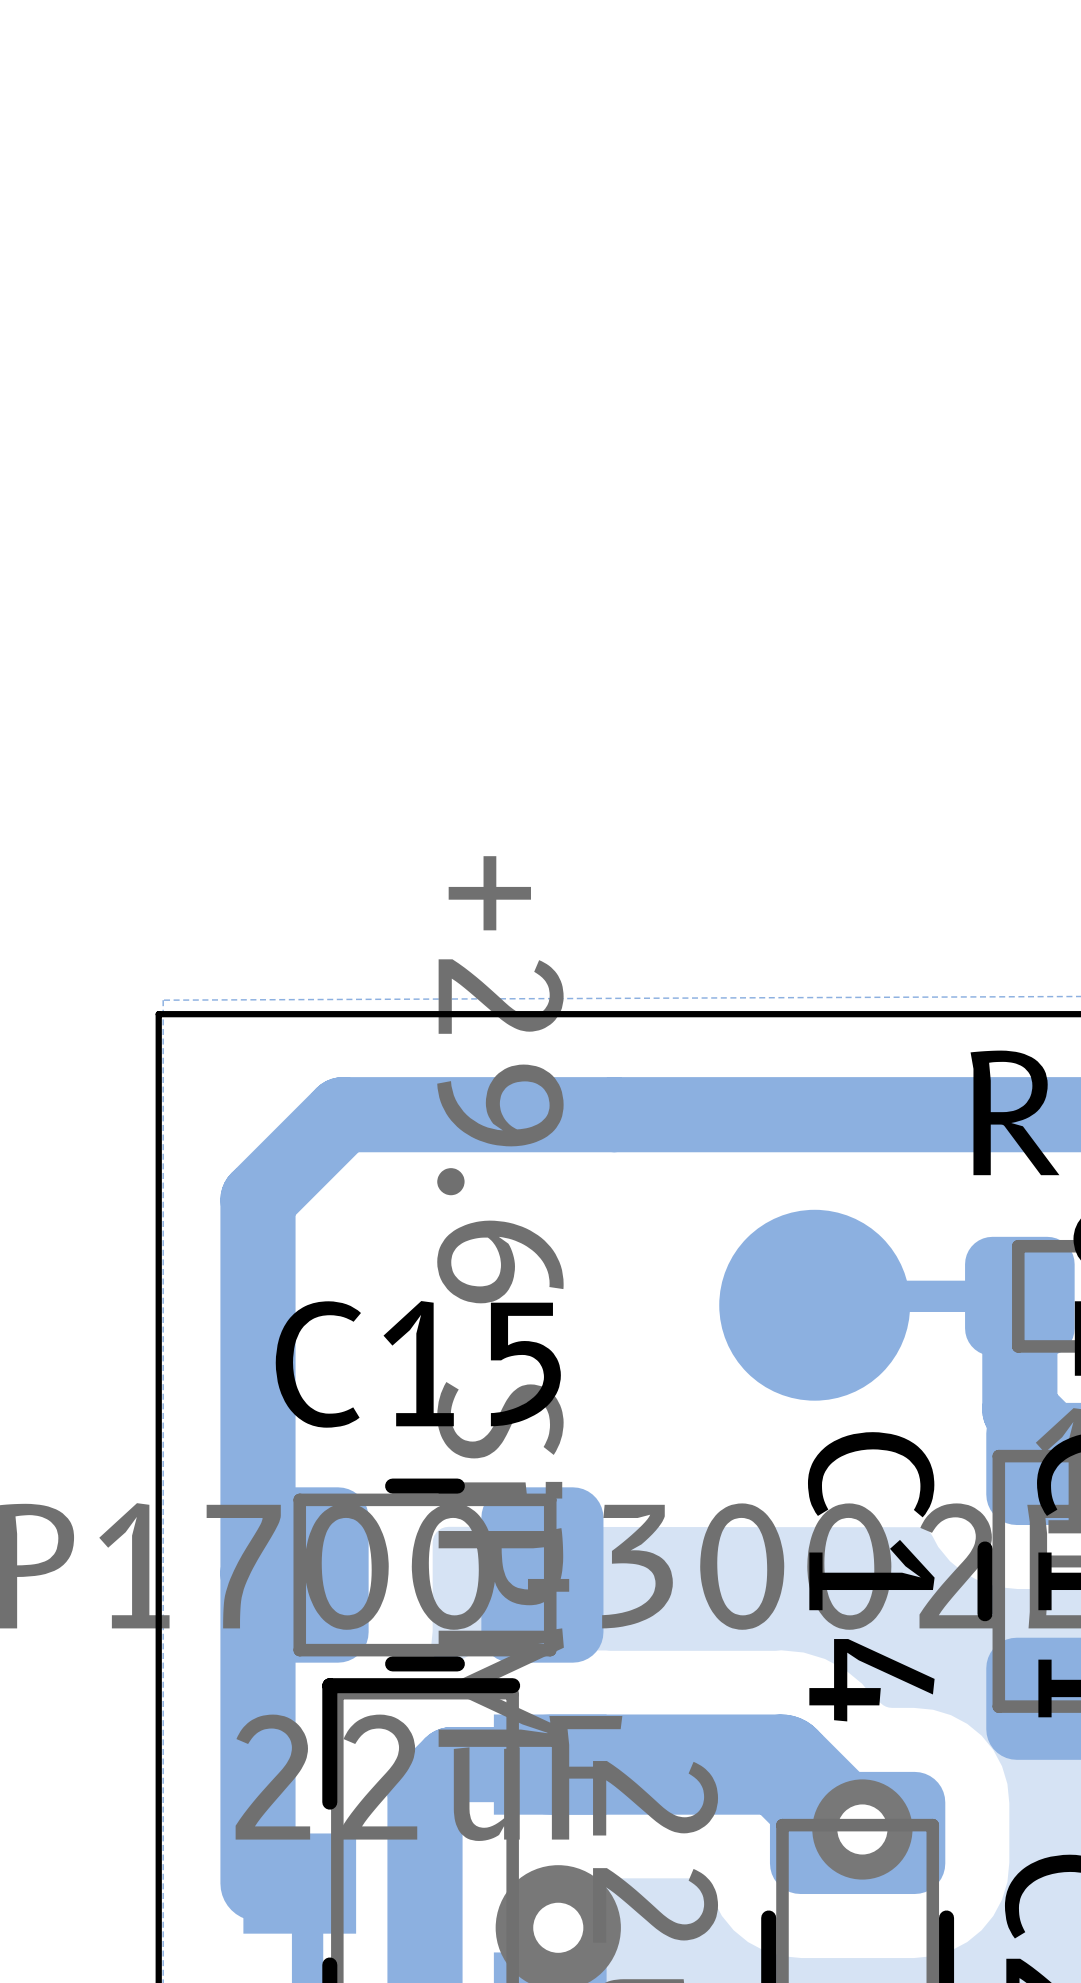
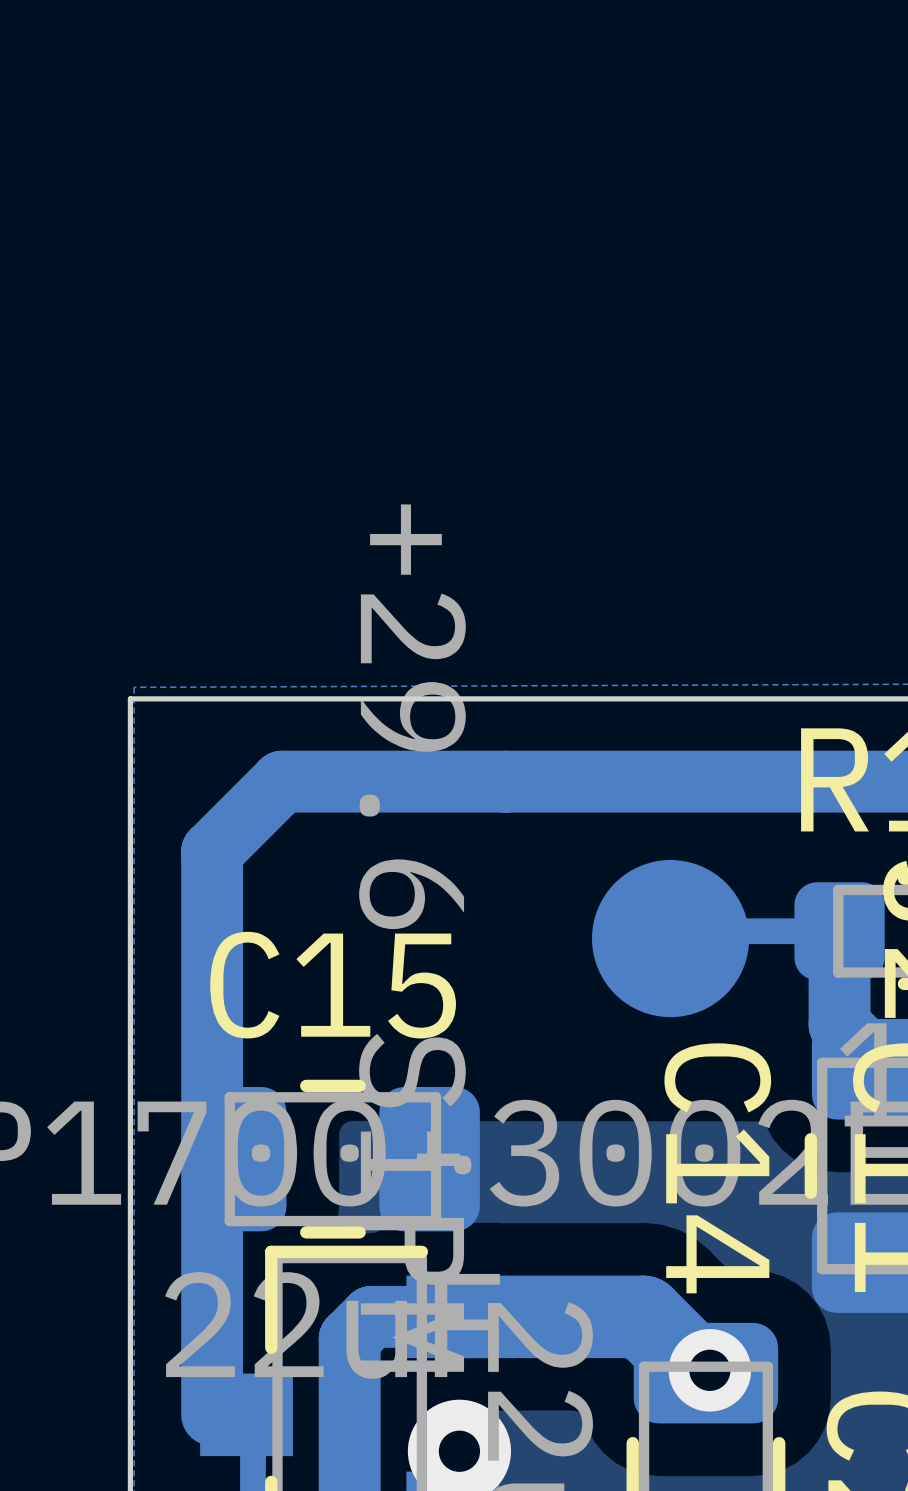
C15 position: (424, 1574) -> (332, 1159)

